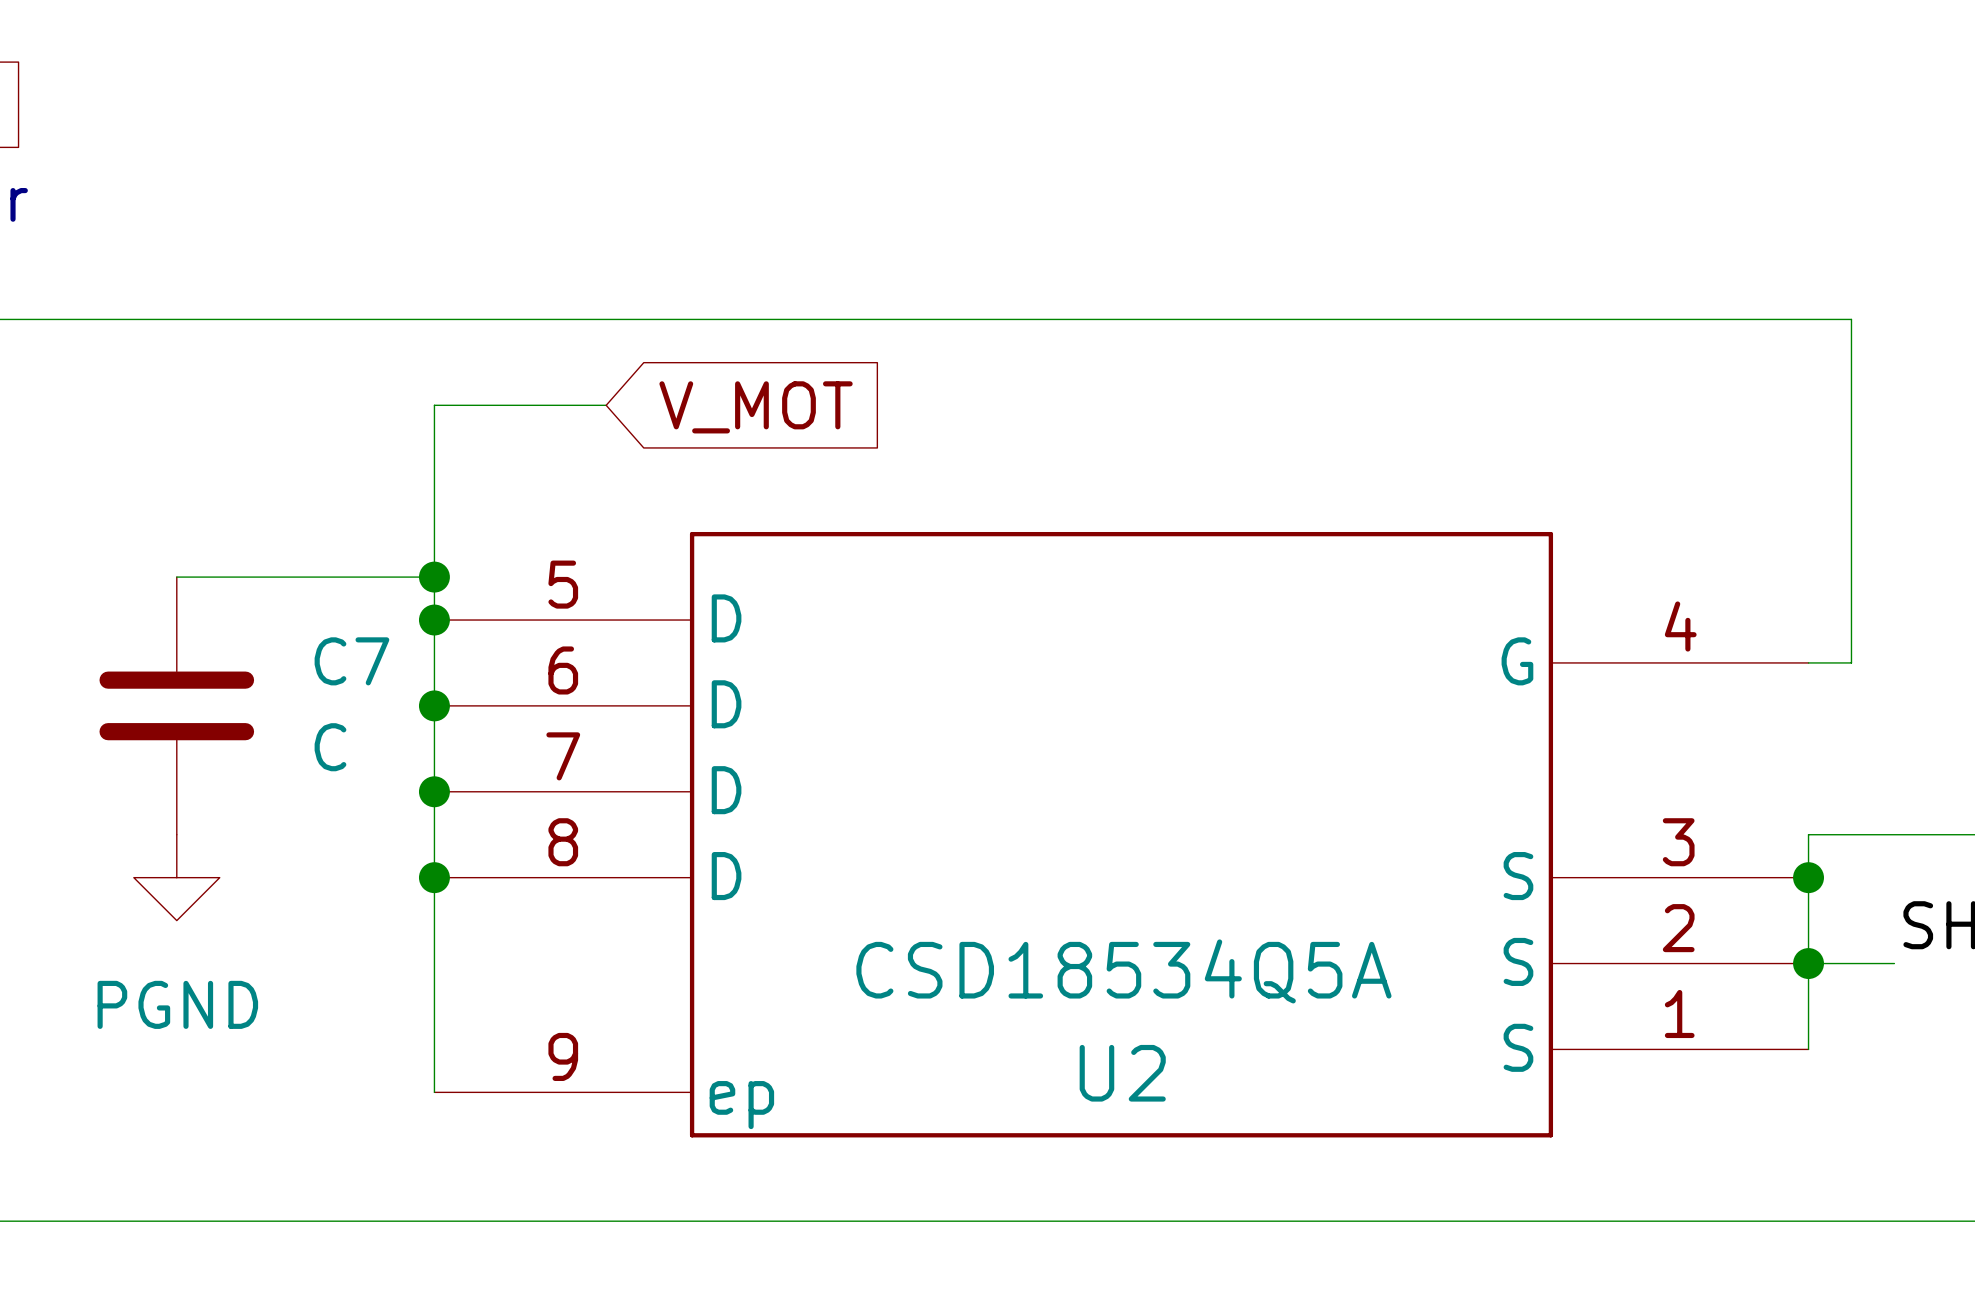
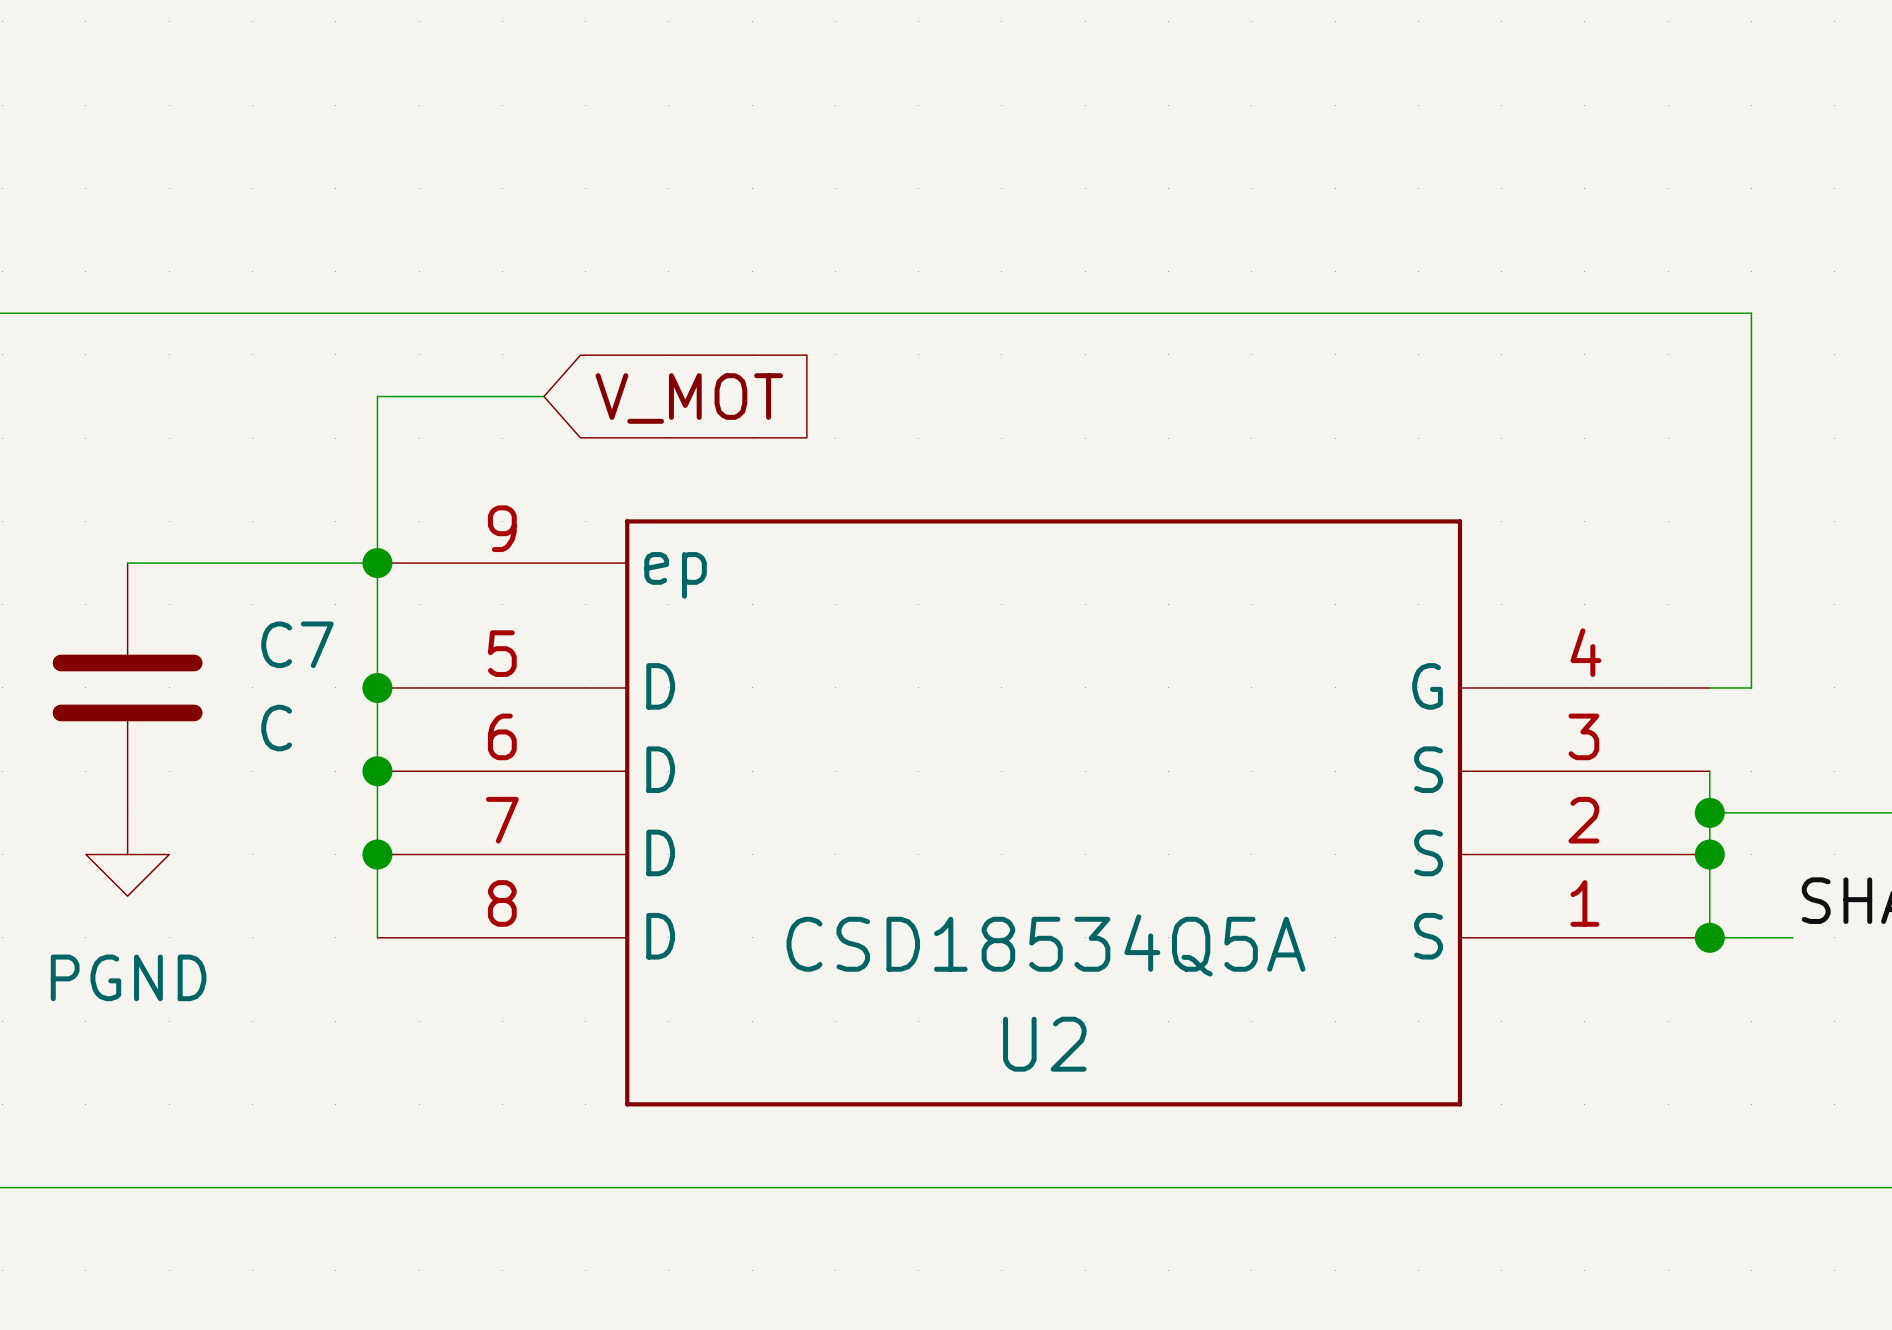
U2 symbol: [434, 531, 1809, 1138] -> [377, 519, 1710, 1107]
junction: (434, 620) -> none
wire: (1808, 662) (1851, 662) -> (1709, 687) (1751, 687) (1751, 646)
wire: none -> (1709, 771) (1709, 812)
junction: none -> (1709, 812)
wire: (434, 963) (434, 1092) -> none
wire: (1808, 963) (1808, 1049) -> none

